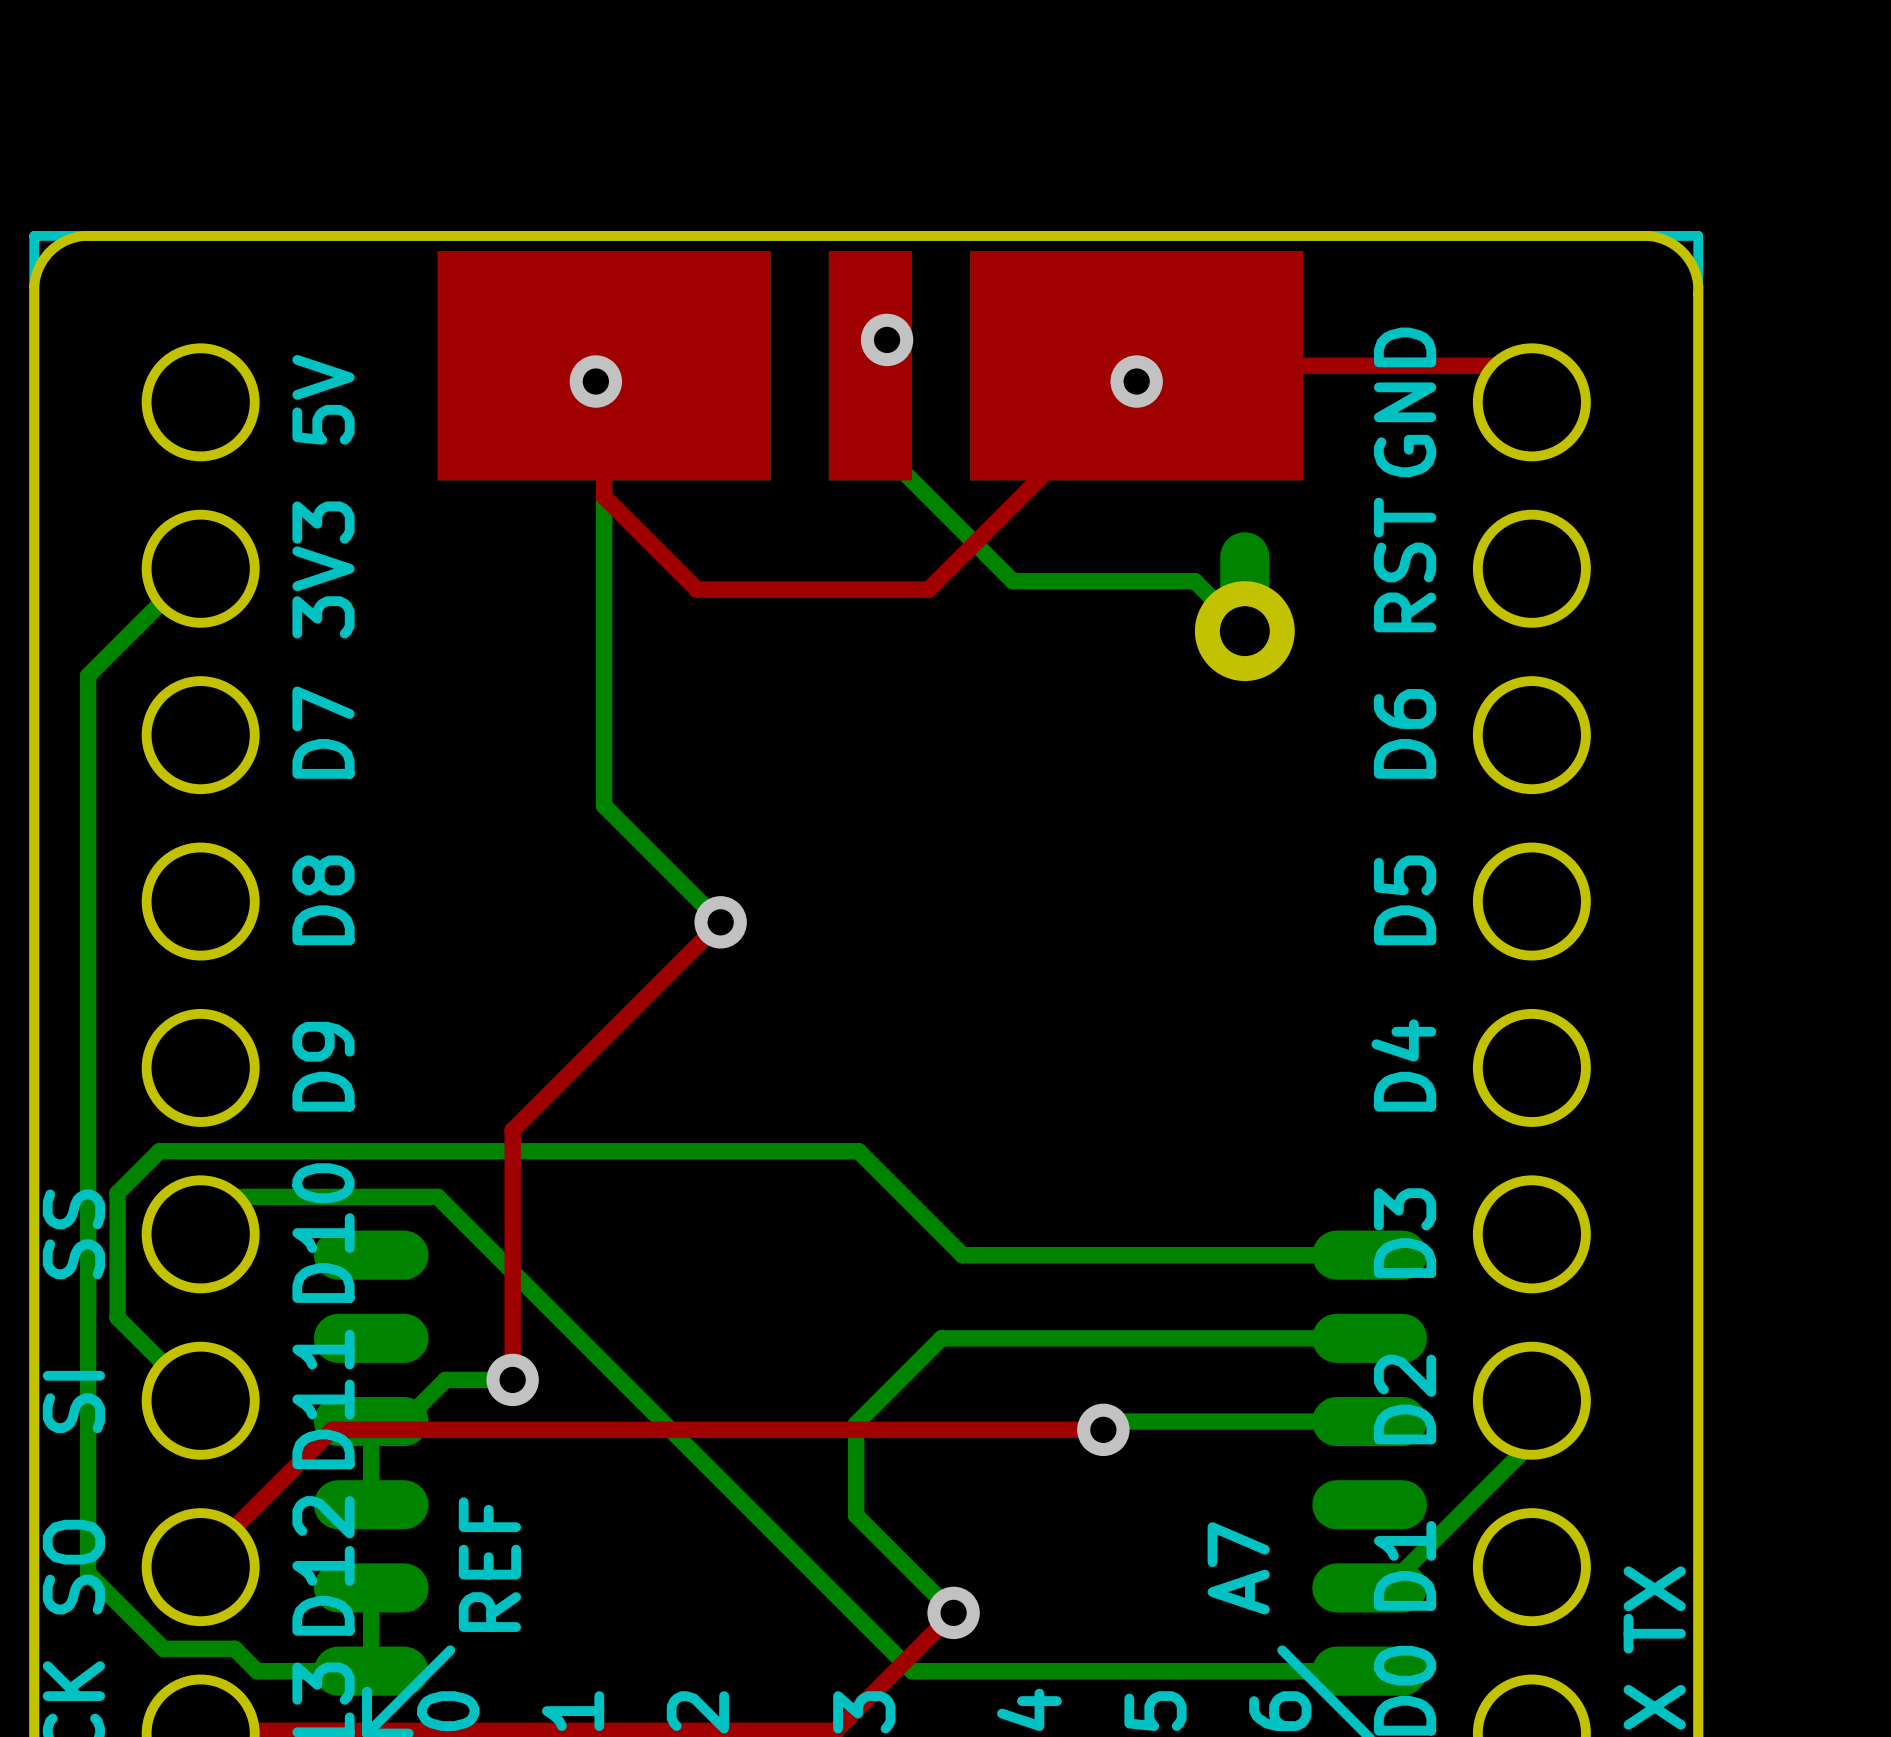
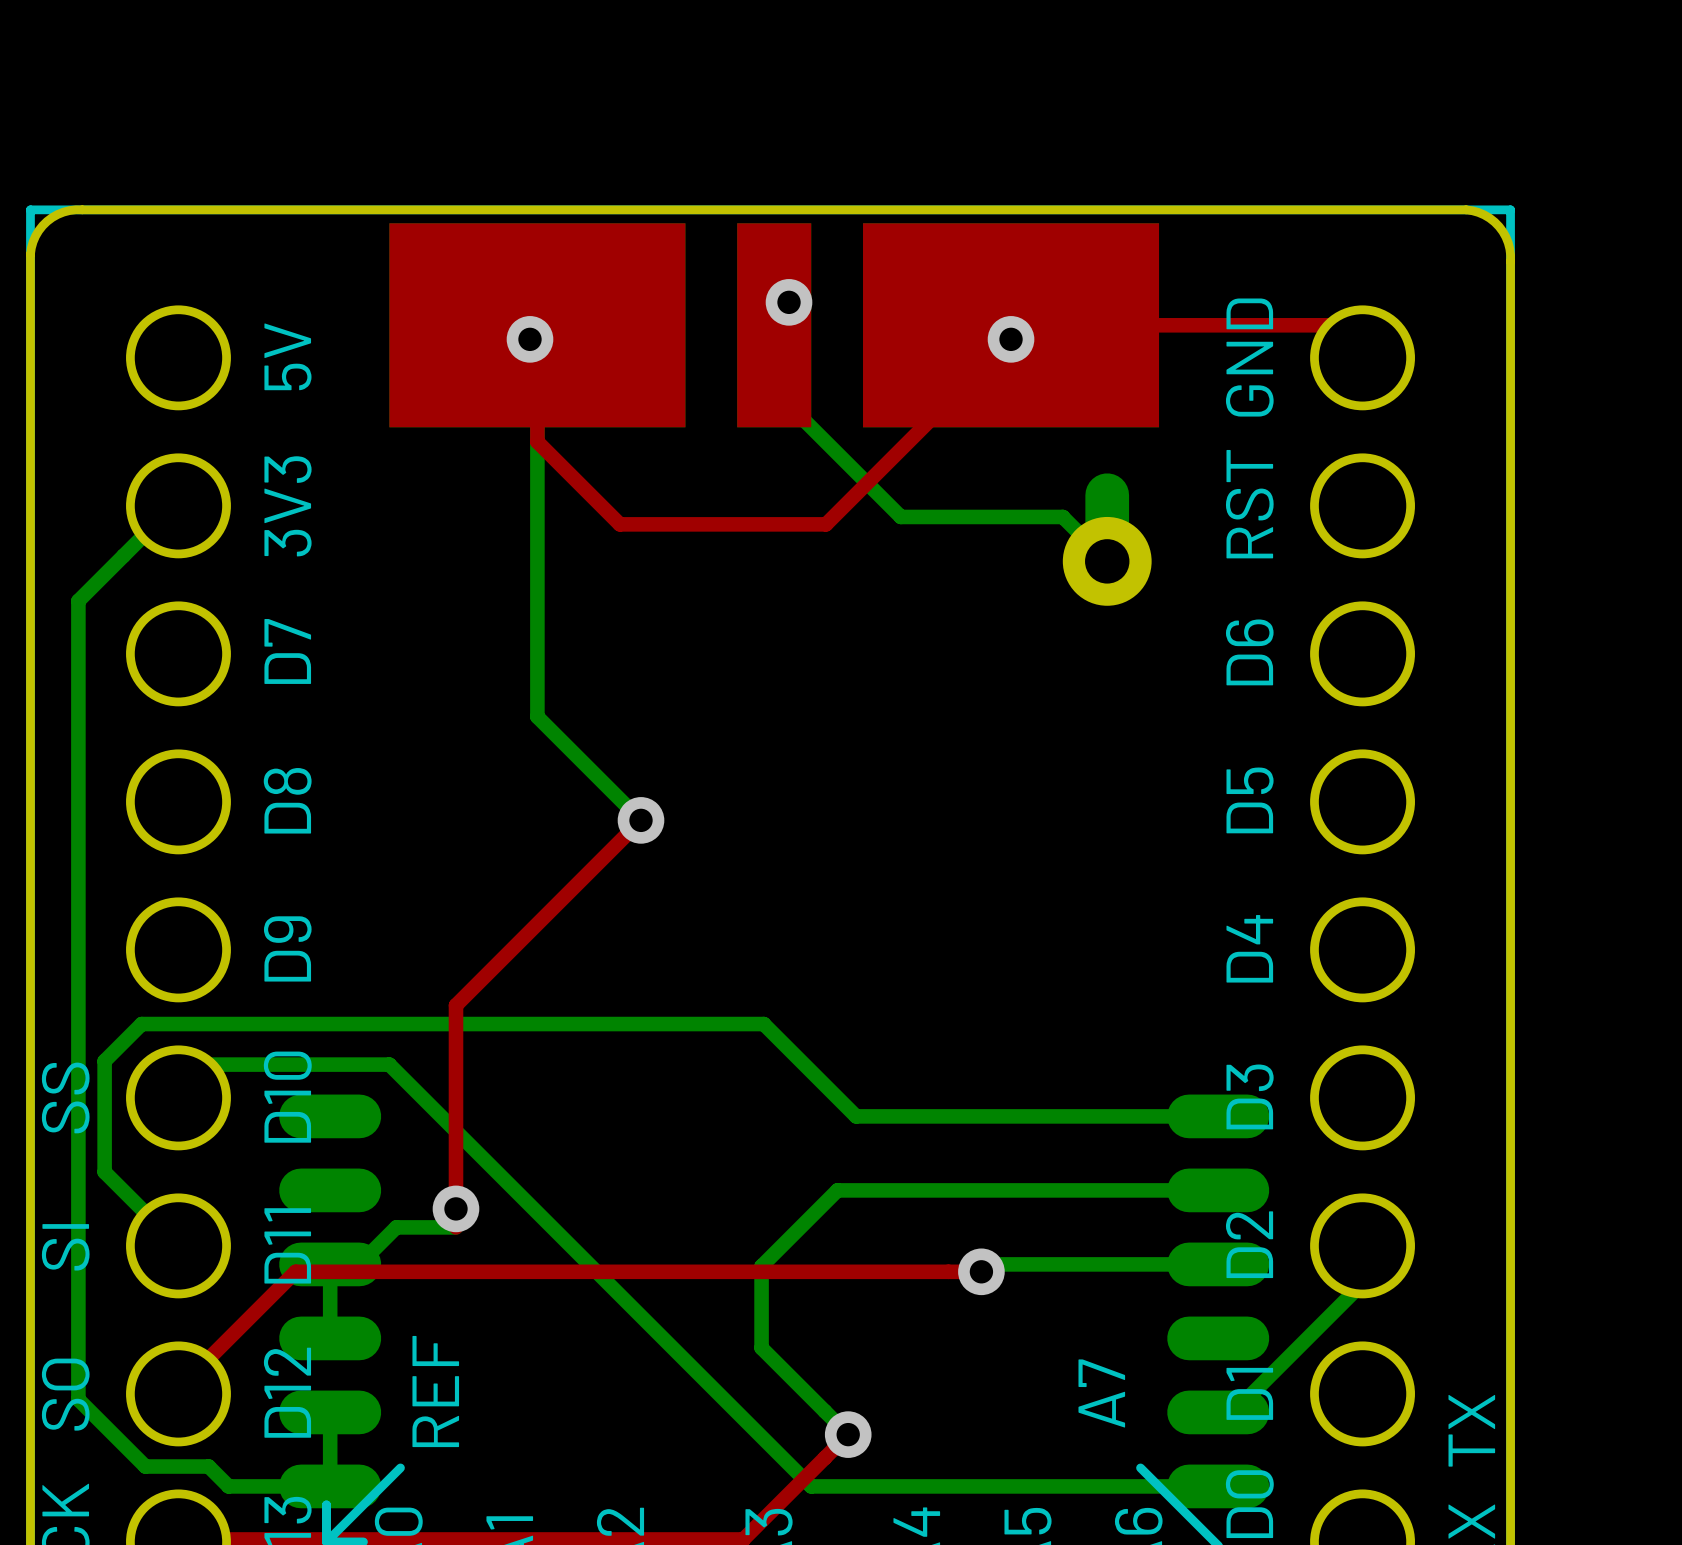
via position: (512, 1379) -> (455, 1208)

